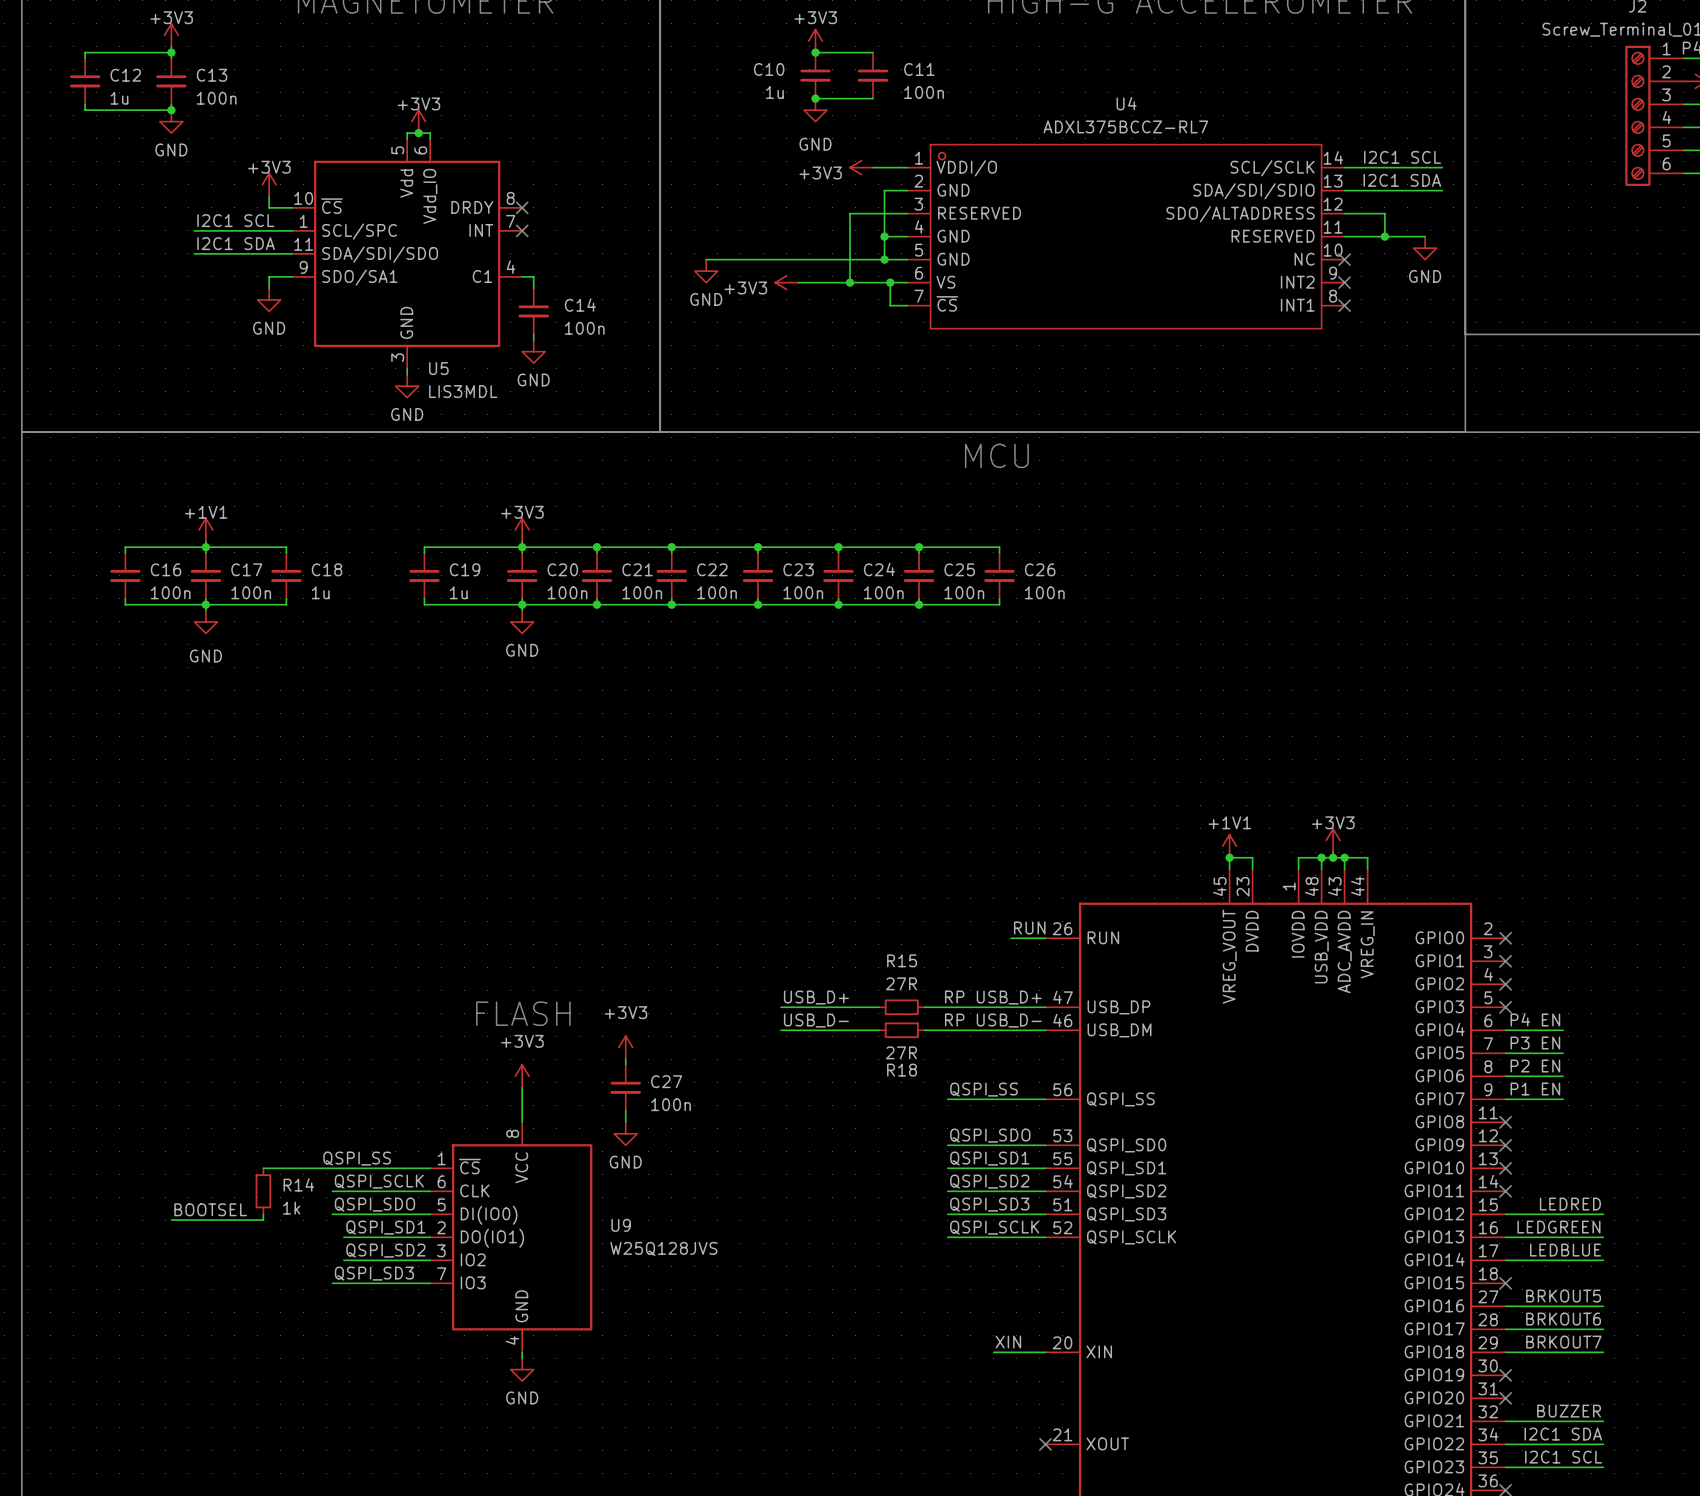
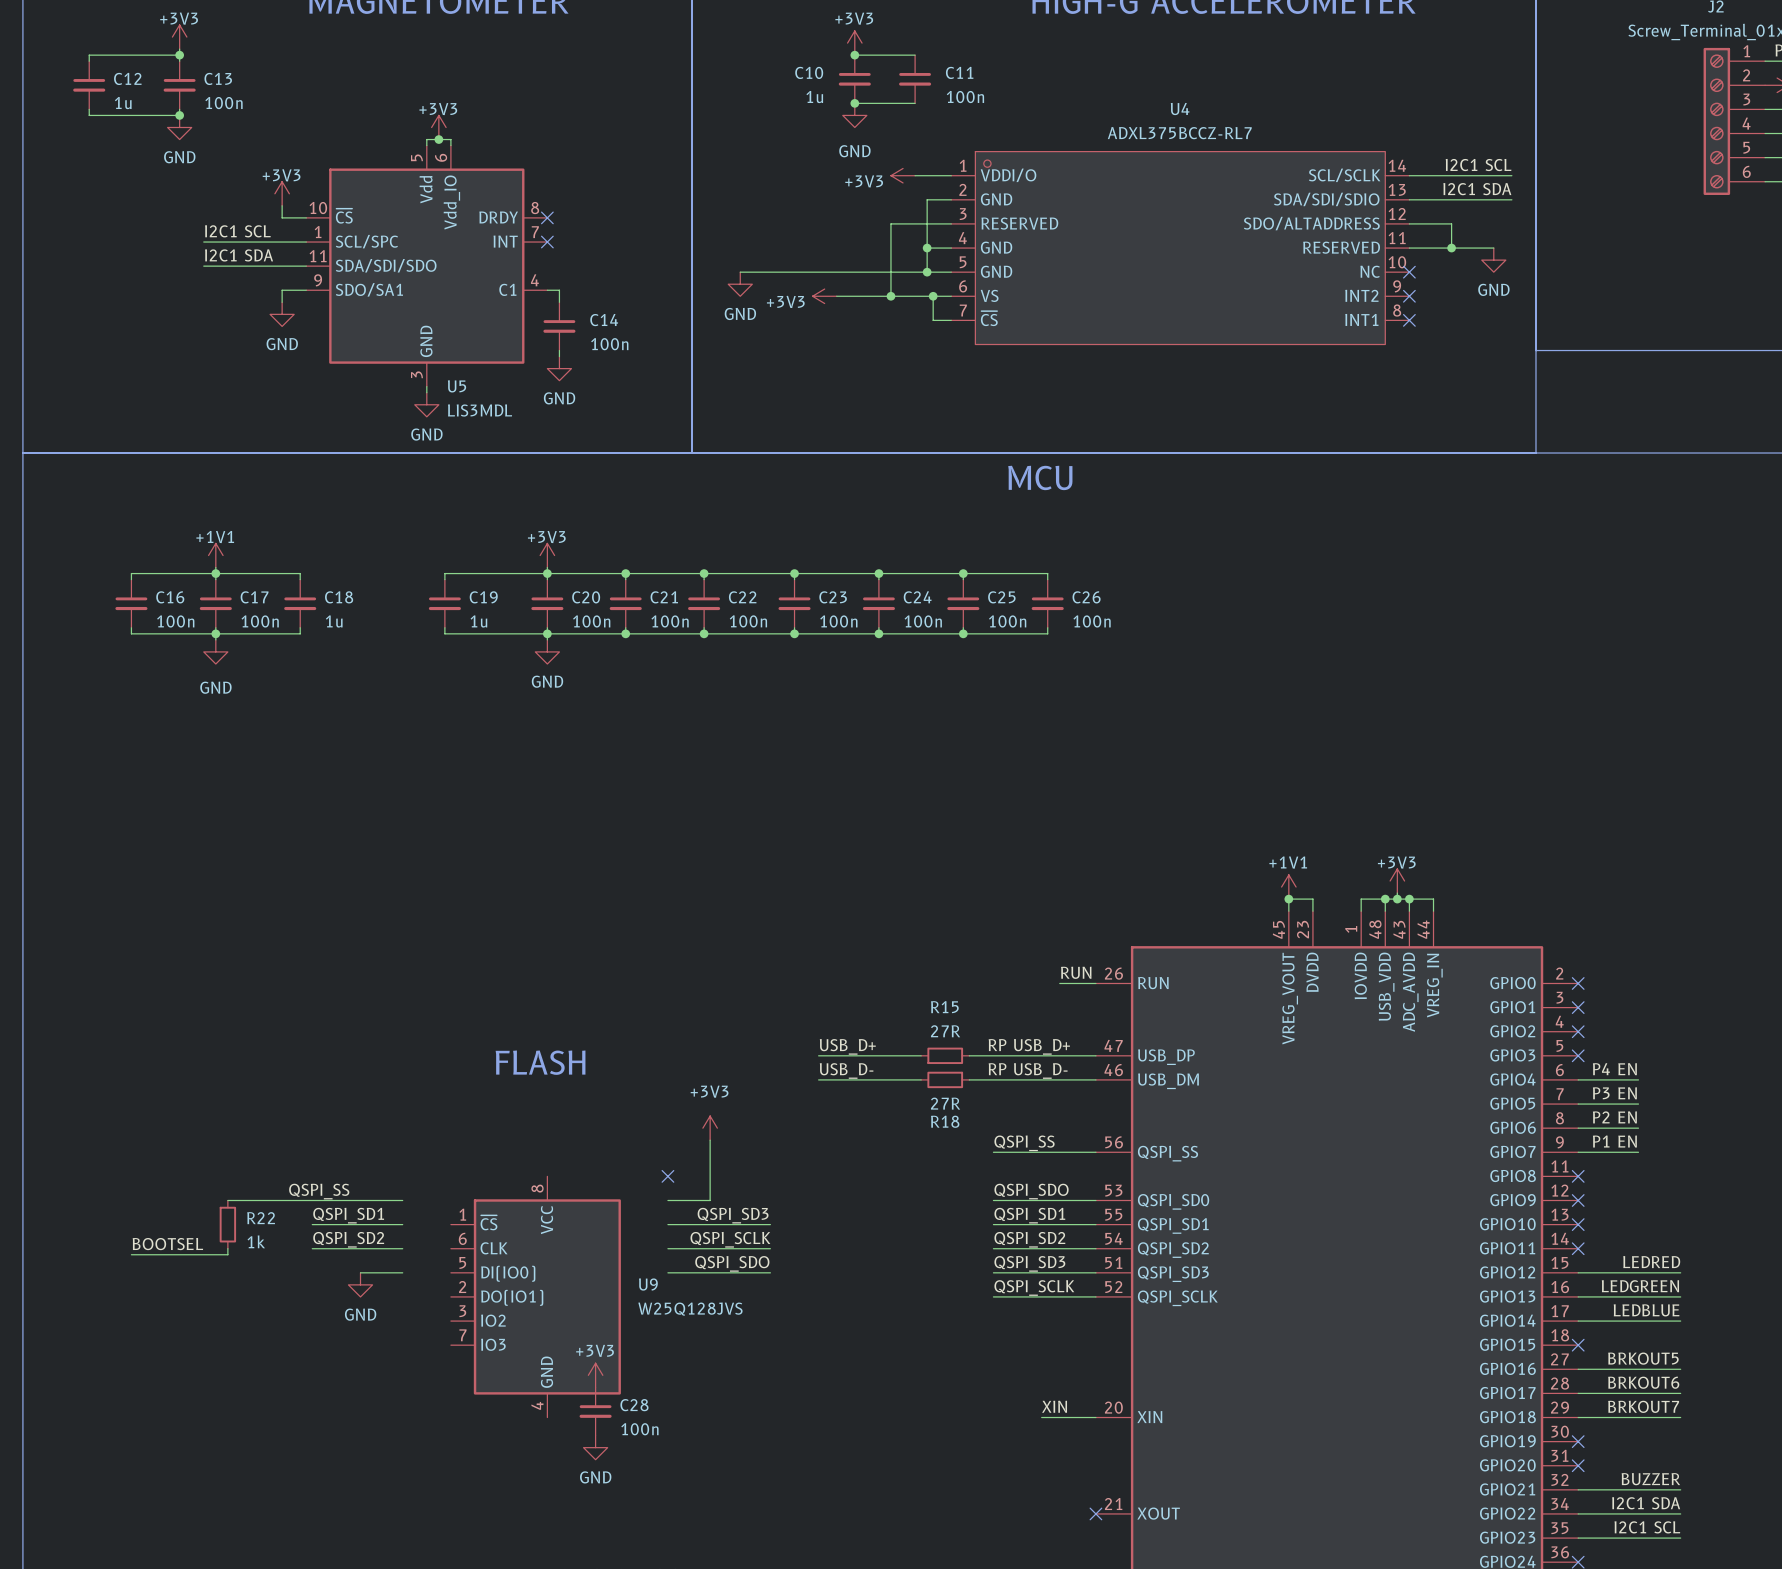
power symbol position: +3V3 (625, 1047) -> +3V3 (710, 1128)
wire: (625, 1059) (625, 1064) -> none
power symbol: +3V3 (522, 1076) -> none
wire: (522, 1087) (522, 1122) -> none
C27: 100n (625, 1087) -> none
wire: none -> (710, 1140) (710, 1200) (667, 1200)
wire: (625, 1110) (625, 1122) -> none
no-connect mark: none -> (667, 1176)
power symbol: GND (625, 1133) -> none
wire: none -> (227, 1200) (402, 1200)
label position: QSPI_SS (357, 1158) -> QSPI_SS (319, 1191)
label: none -> QSPI_SD3 (733, 1215)
R22: none -> 1k (227, 1224)
wire: (263, 1168) (297, 1168) -> (312, 1248) (348, 1248)
wire: (384, 1168) (430, 1168) -> none
wire: none -> (667, 1224) (770, 1224)
label: QSPI_SCLK (379, 1181) -> none
label: none -> QSPI_SCLK (730, 1239)
R14: 1k (263, 1191) -> none
wire: (384, 1191) (430, 1191) -> none
wire: none -> (667, 1248) (770, 1248)
label: QSPI_SDO (374, 1204) -> none
label: none -> QSPI_SDO (732, 1263)
label position: BOOTSEL (210, 1209) -> BOOTSEL (167, 1244)
wire: (263, 1214) (263, 1220) (171, 1220) -> (227, 1248) (227, 1254) (131, 1254)
wire: (332, 1214) (343, 1214) -> none
wire: (384, 1214) (430, 1214) -> none
wire: none -> (667, 1272) (770, 1272)
power symbol: none -> GND (360, 1284)
label position: QSPI_SD1 (385, 1227) -> QSPI_SD1 (348, 1215)
wire: (343, 1237) (430, 1237) -> none
label position: QSPI_SD2 (385, 1250) -> QSPI_SD2 (348, 1239)
wire: (343, 1260) (430, 1260) -> none
label: QSPI_SD3 (374, 1273) -> none
wire: (332, 1283) (430, 1283) -> none
power symbol: none -> +3V3 (595, 1375)
C28: none -> 100n (595, 1411)
wire: (522, 1352) (522, 1358) -> none
power symbol position: GND (522, 1369) -> GND (595, 1447)

